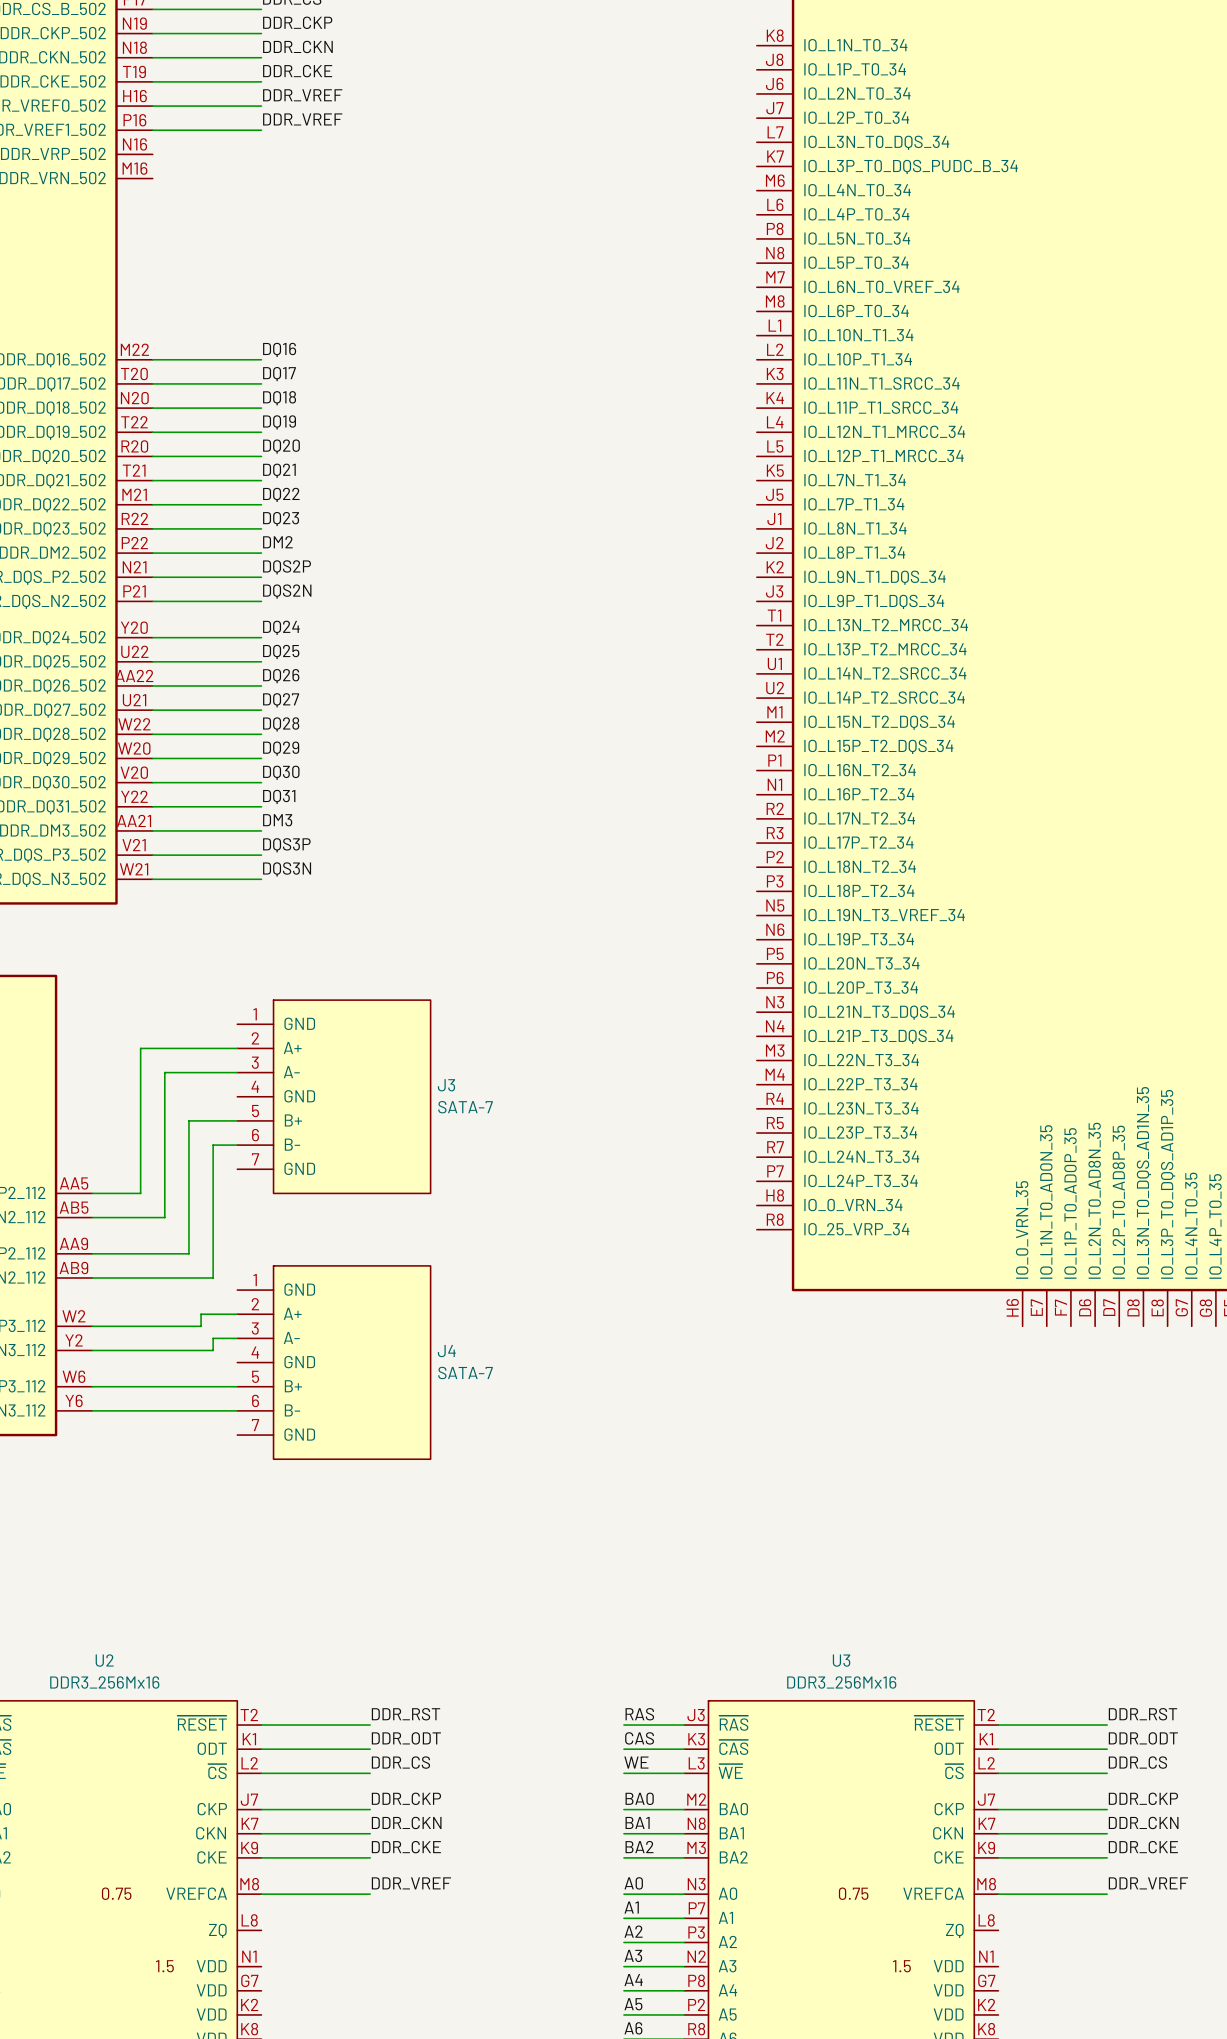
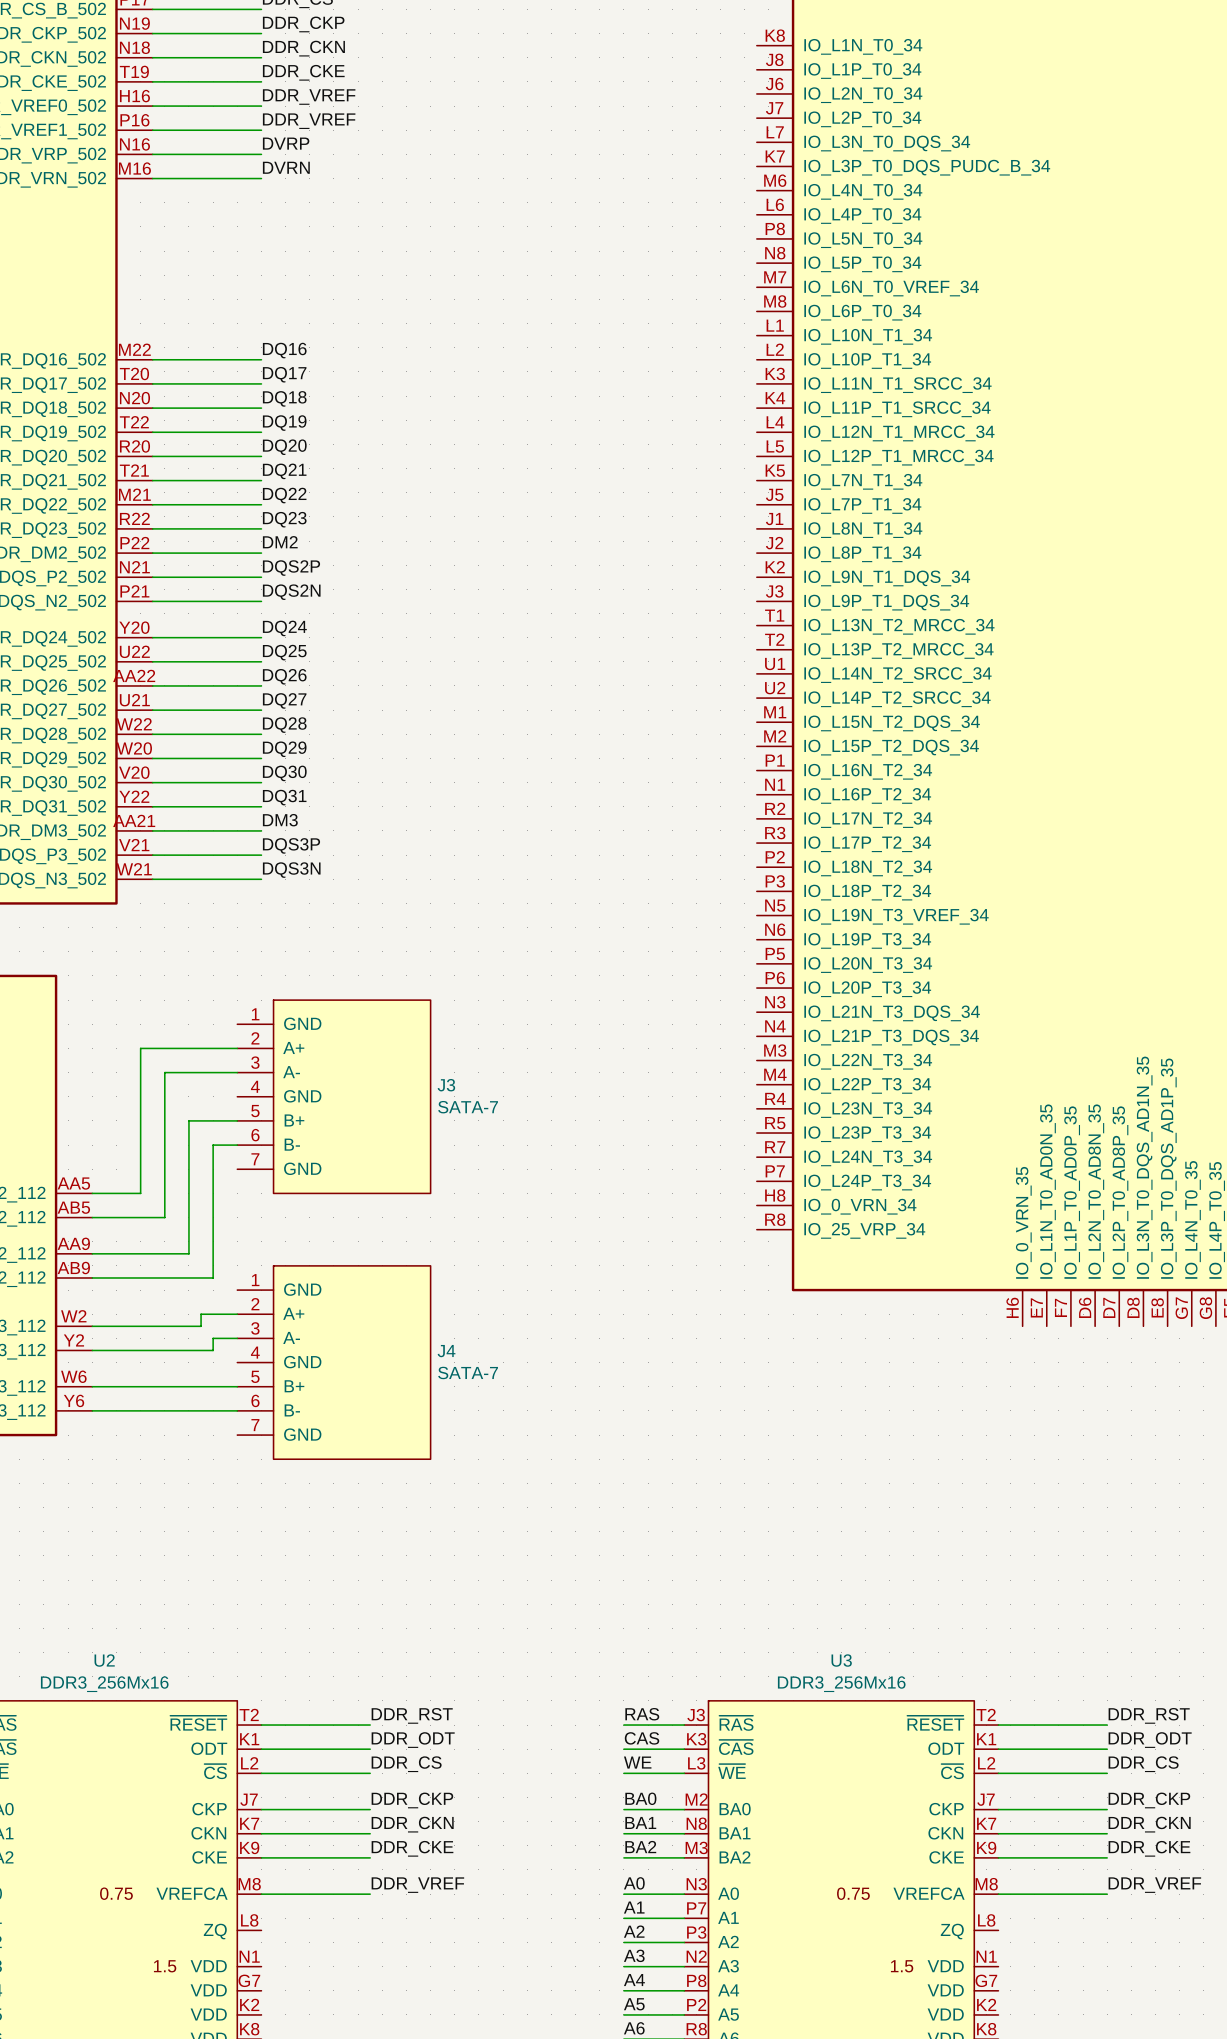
label: none -> DVRP (286, 143)
wire: none -> (152, 154) (261, 154)
label: none -> DVRN (286, 167)
wire: none -> (152, 178) (261, 178)

